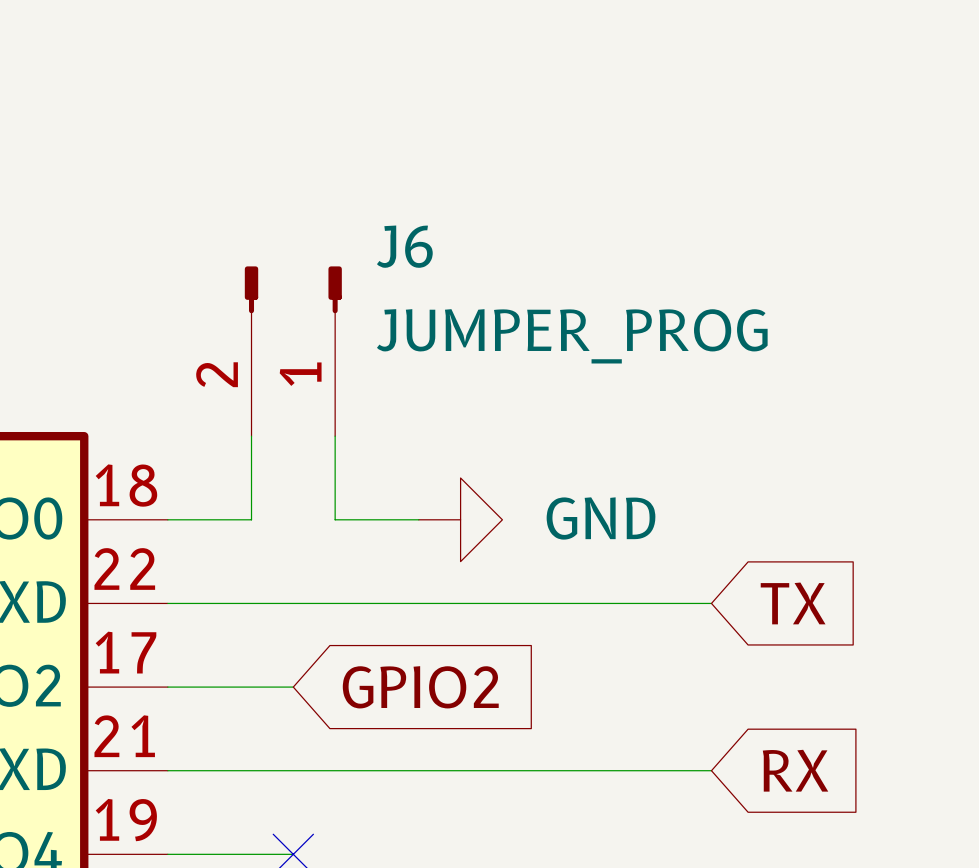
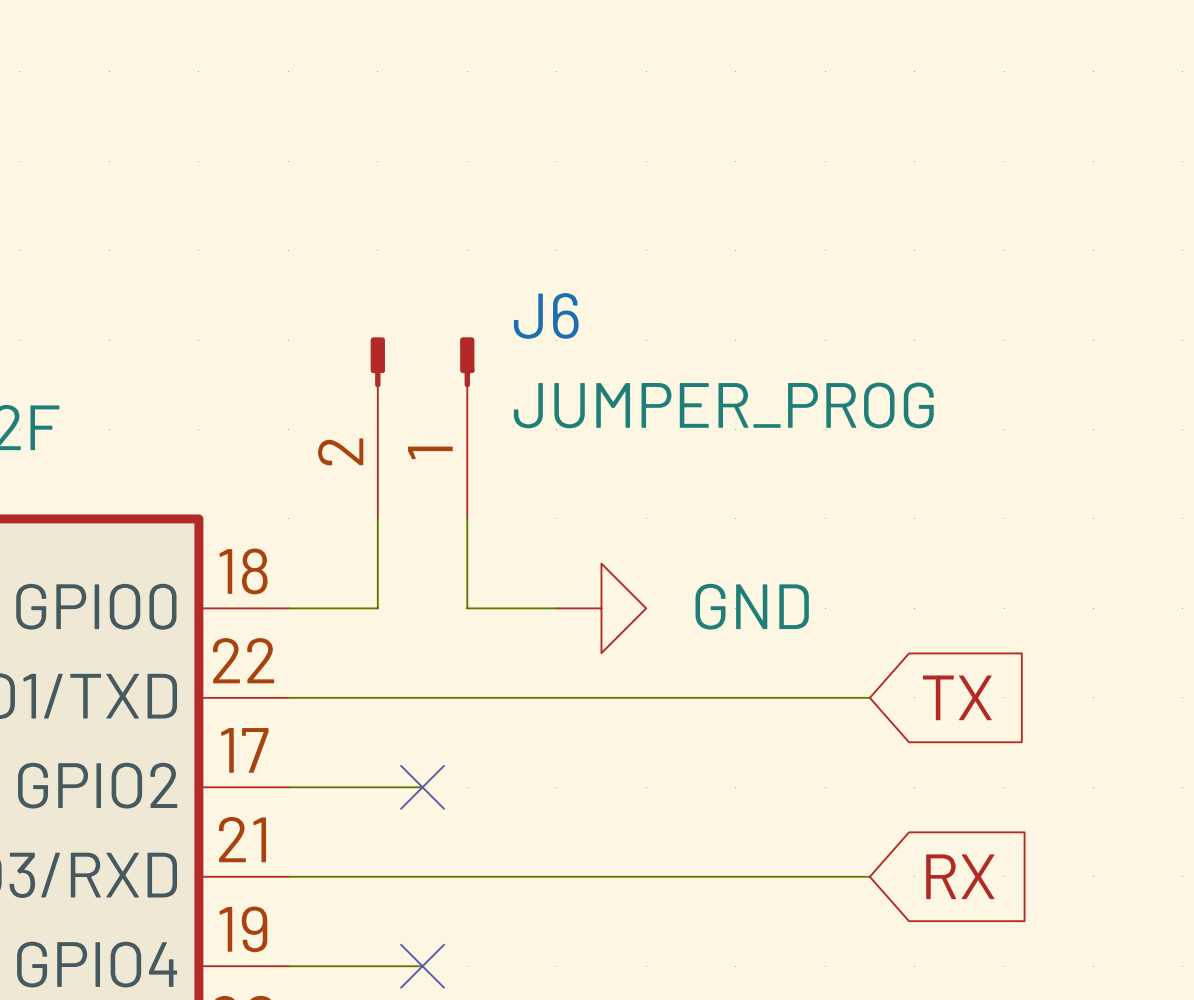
no-connect mark: none -> (422, 787)
global label: GPIO2 (420, 687) -> none

